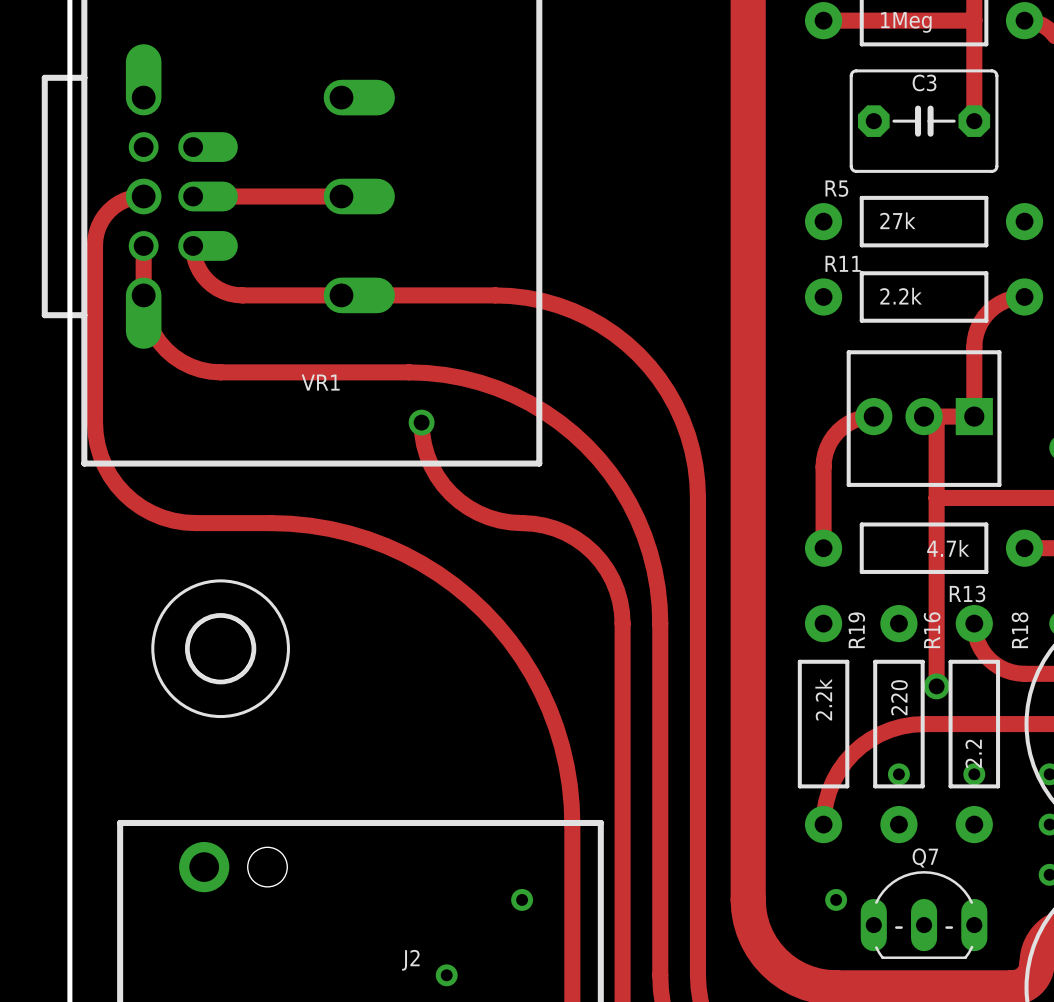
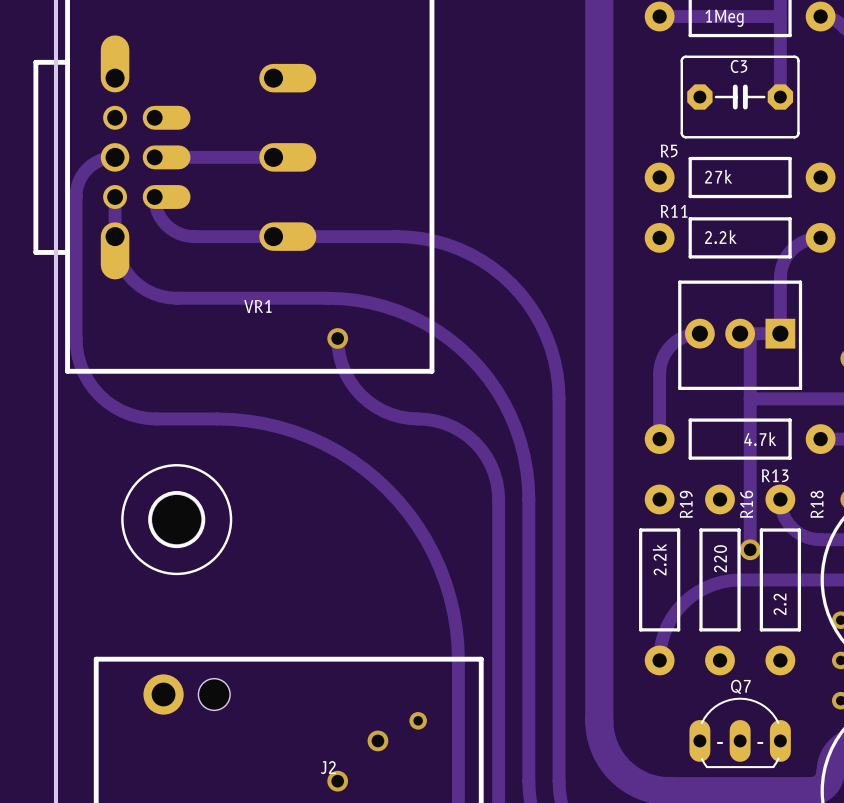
via: (898, 774) -> none
via: (974, 774) -> none
via: (836, 899) -> none
via: none -> (377, 740)
via: none -> (337, 781)
via: (446, 975) -> none

